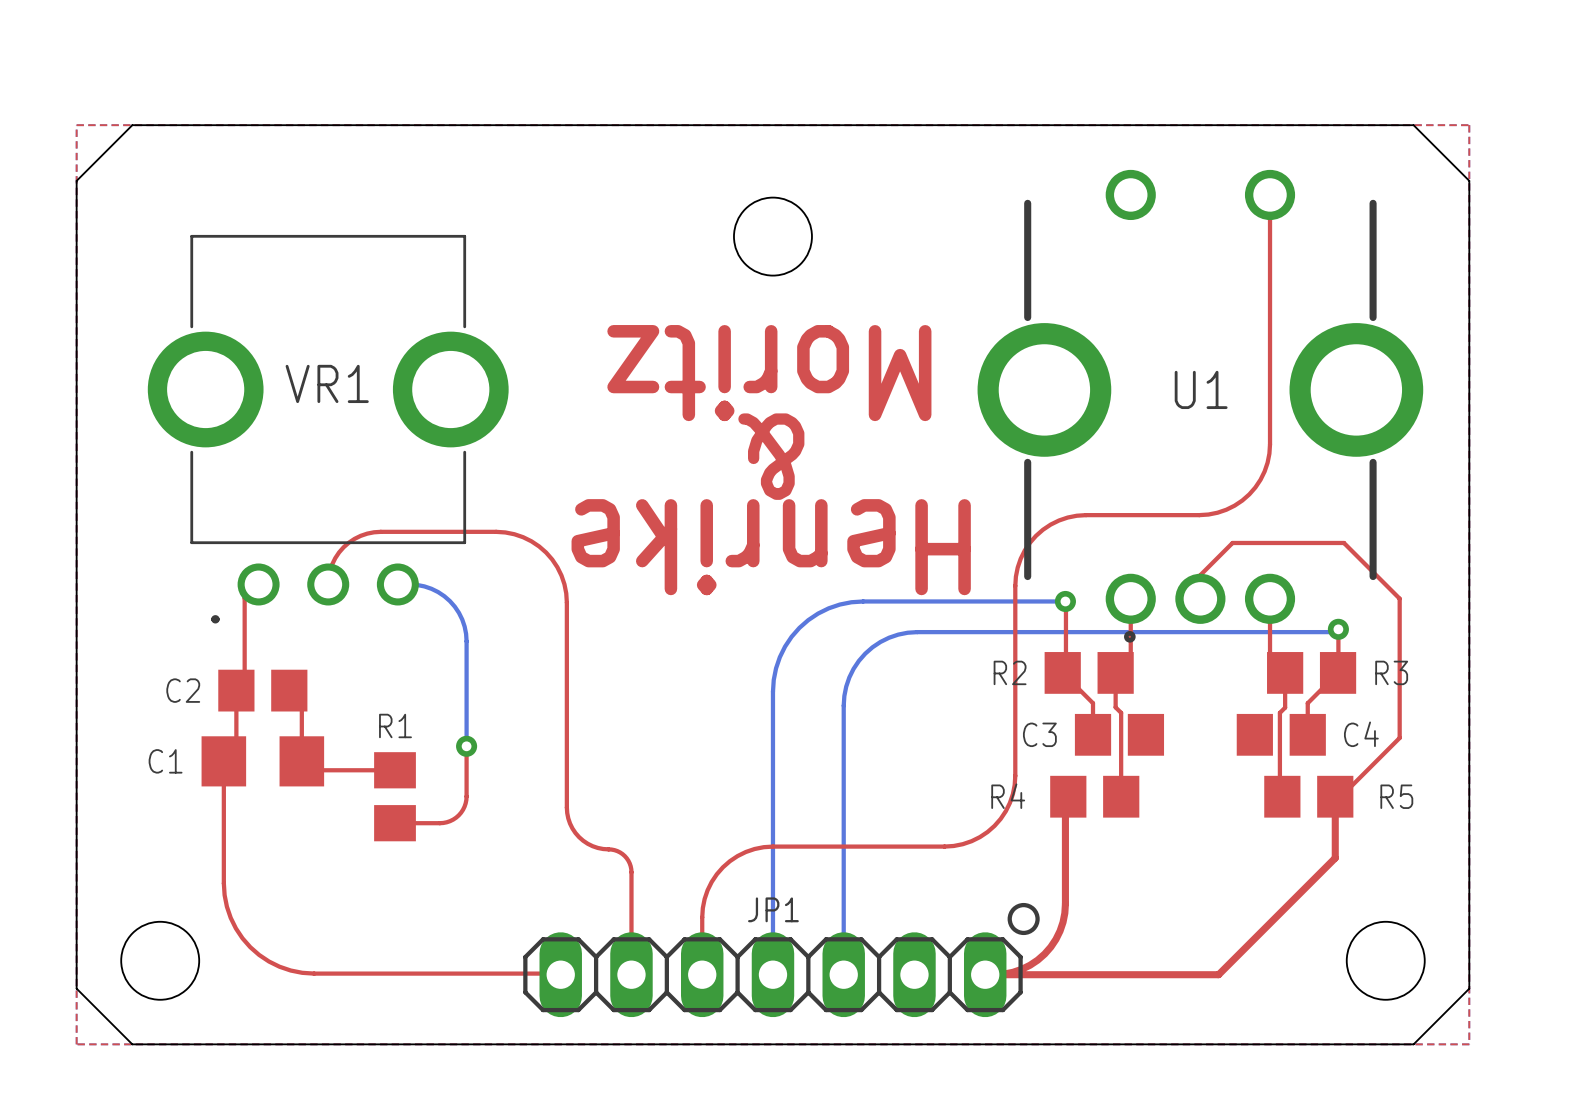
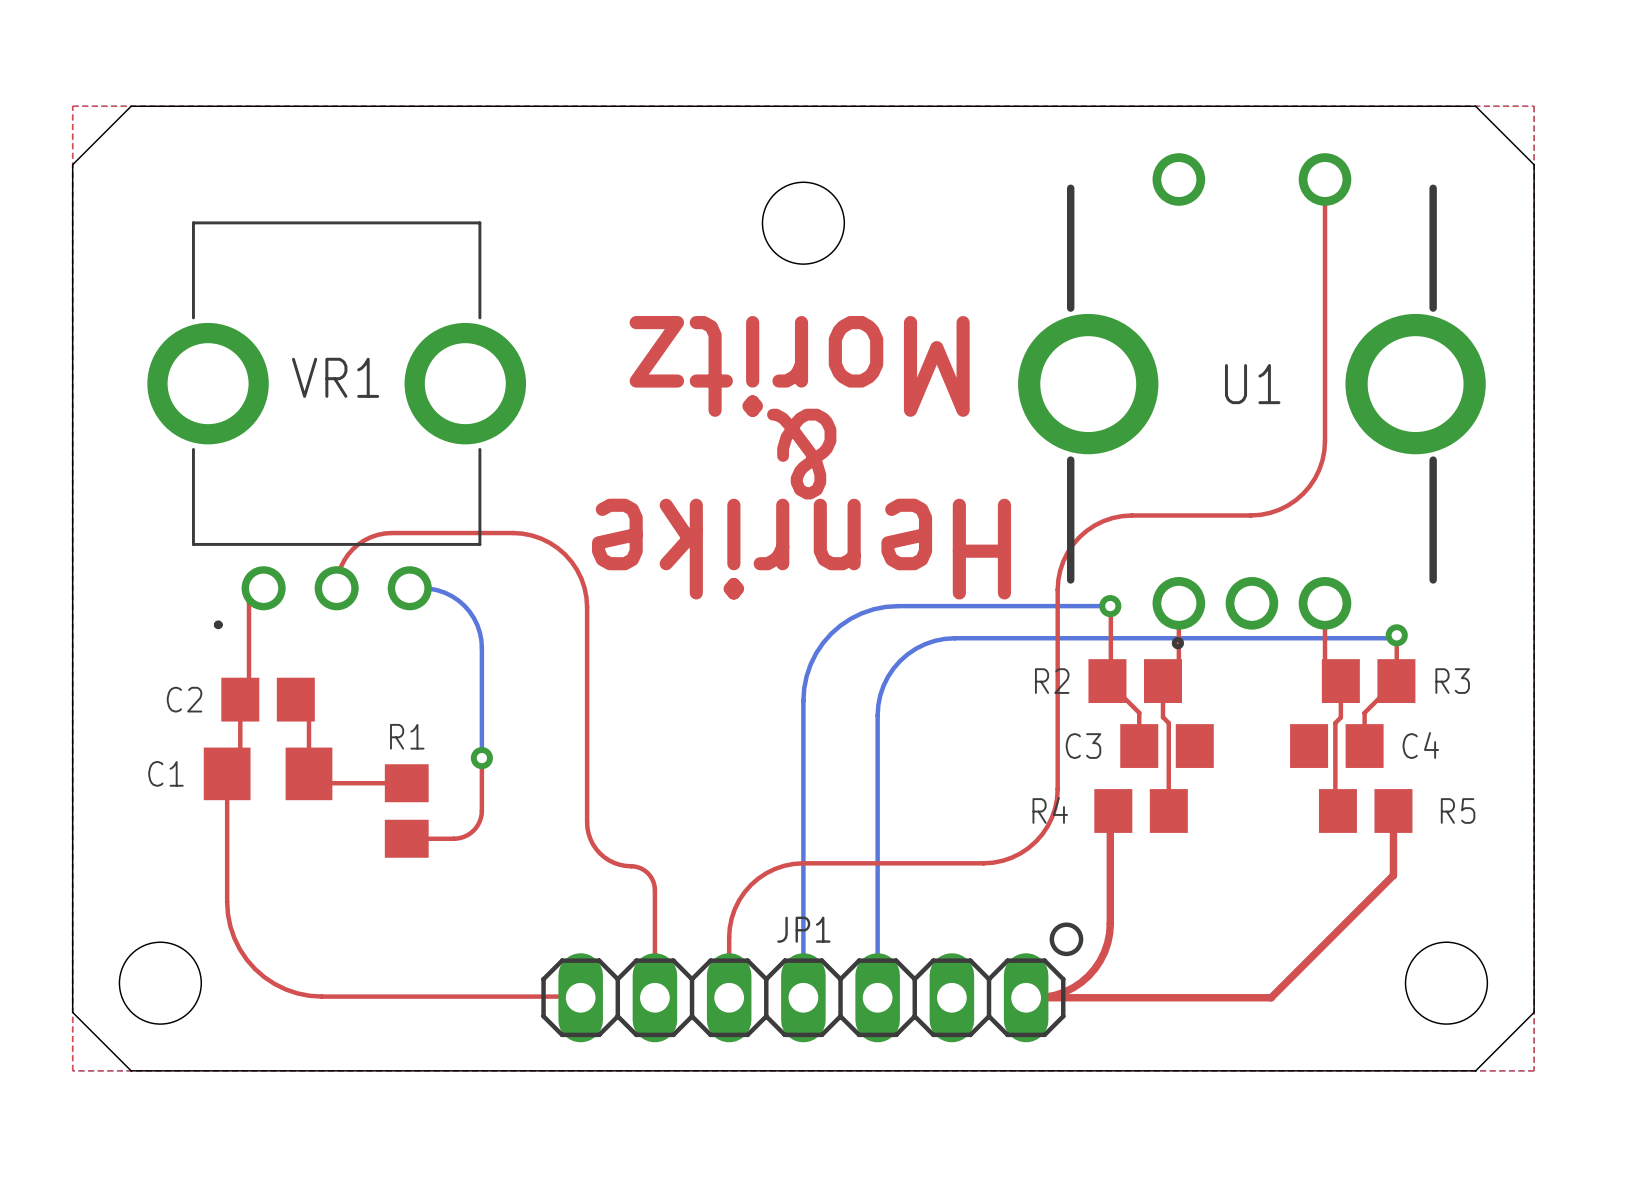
top track: (1200, 598) (1200, 575) (1232, 542) (1343, 542) (1399, 598) (1399, 737) (1340, 796) (1335, 796) -> none

